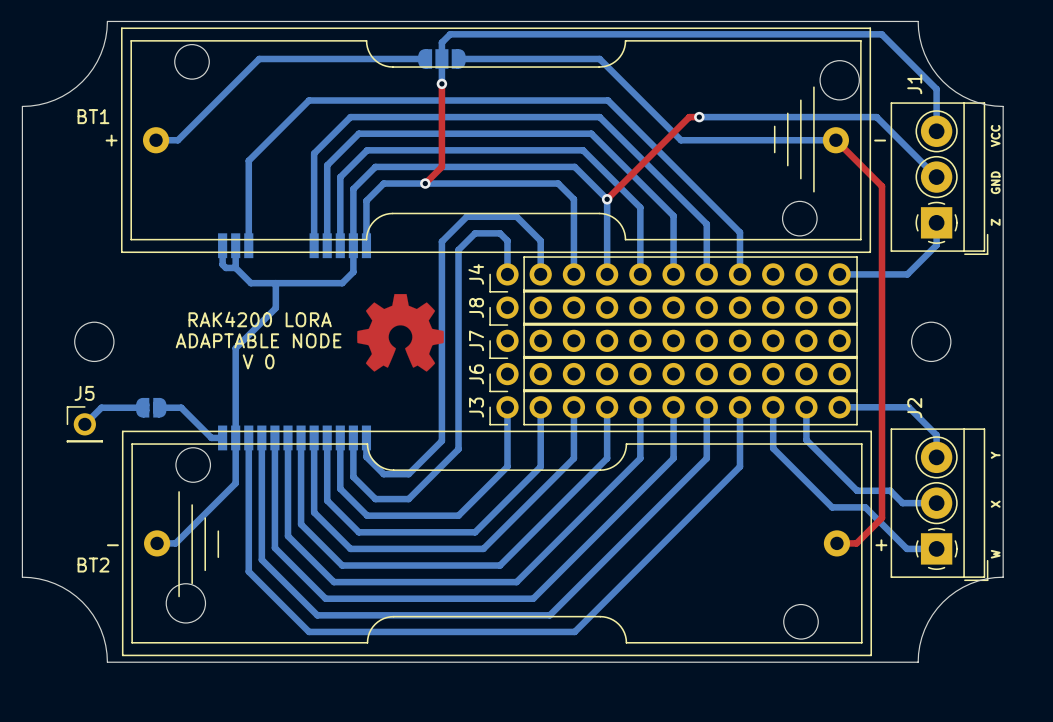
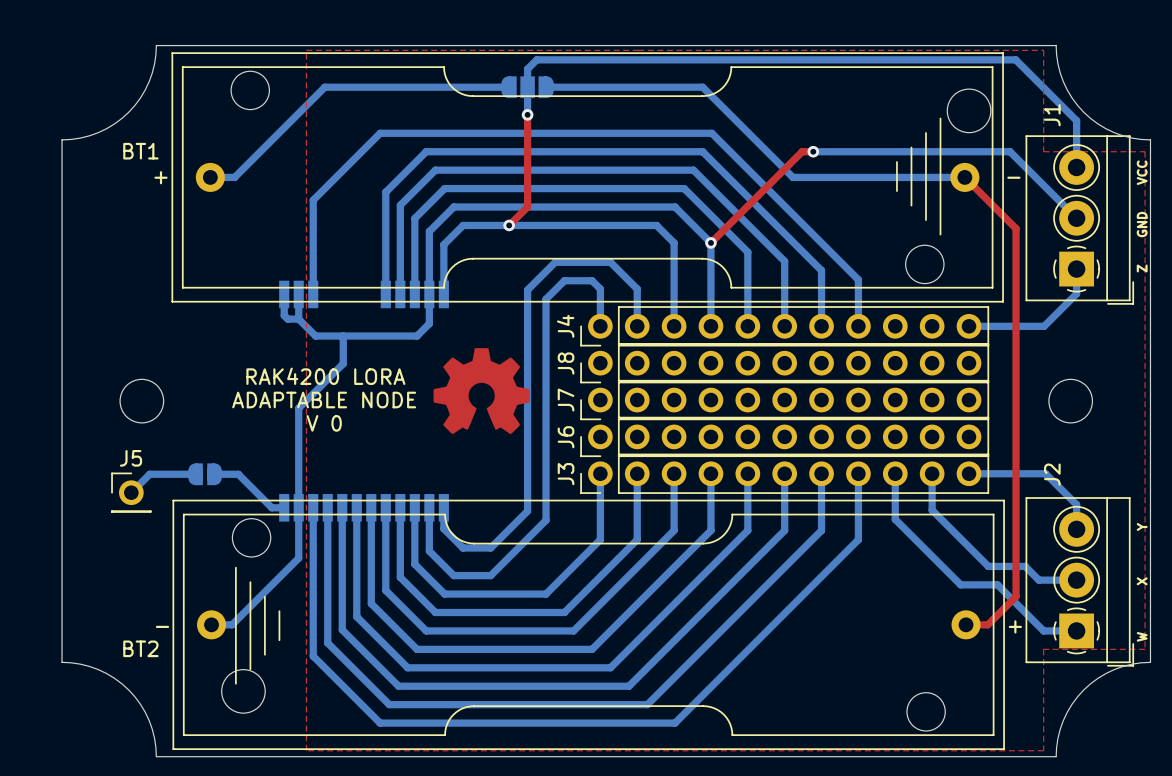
top zone outline: none -> (306, 50) (306, 750) (1043, 750) (1043, 649) (1145, 649) (1145, 151) (1043, 151) (1043, 50) (306, 50)

